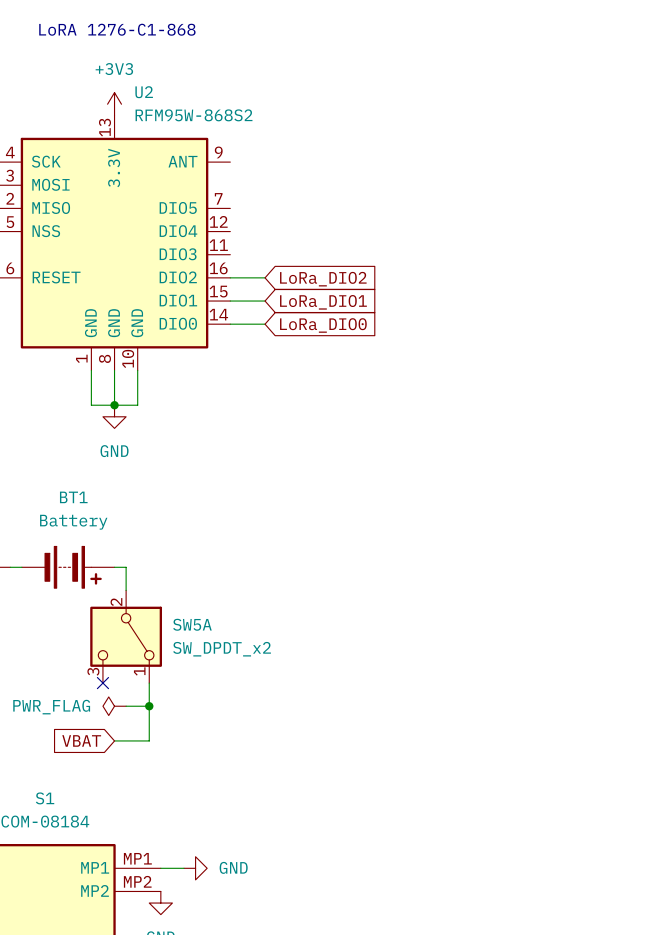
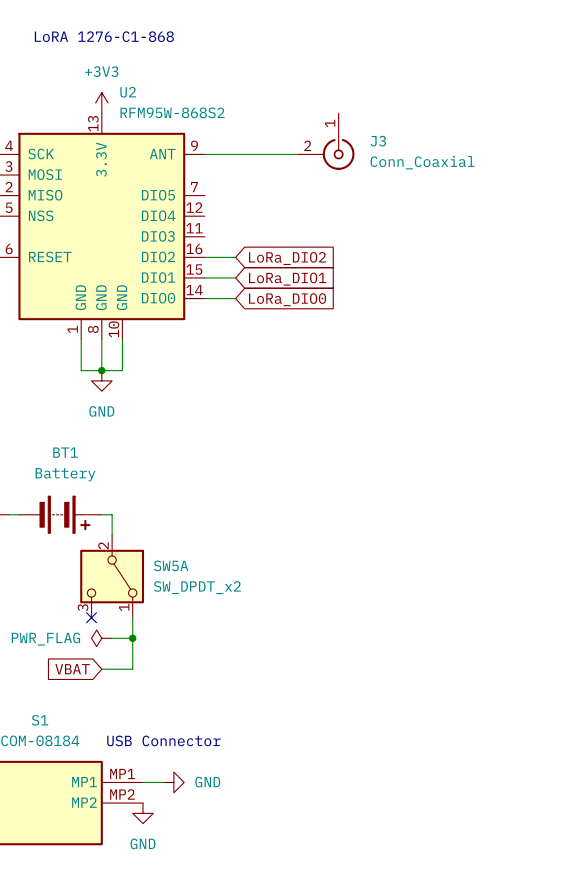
J3: none -> Conn_Coaxial (325, 141)
wire: none -> (204, 154) (297, 154)
text: none -> USB Connector (163, 740)

